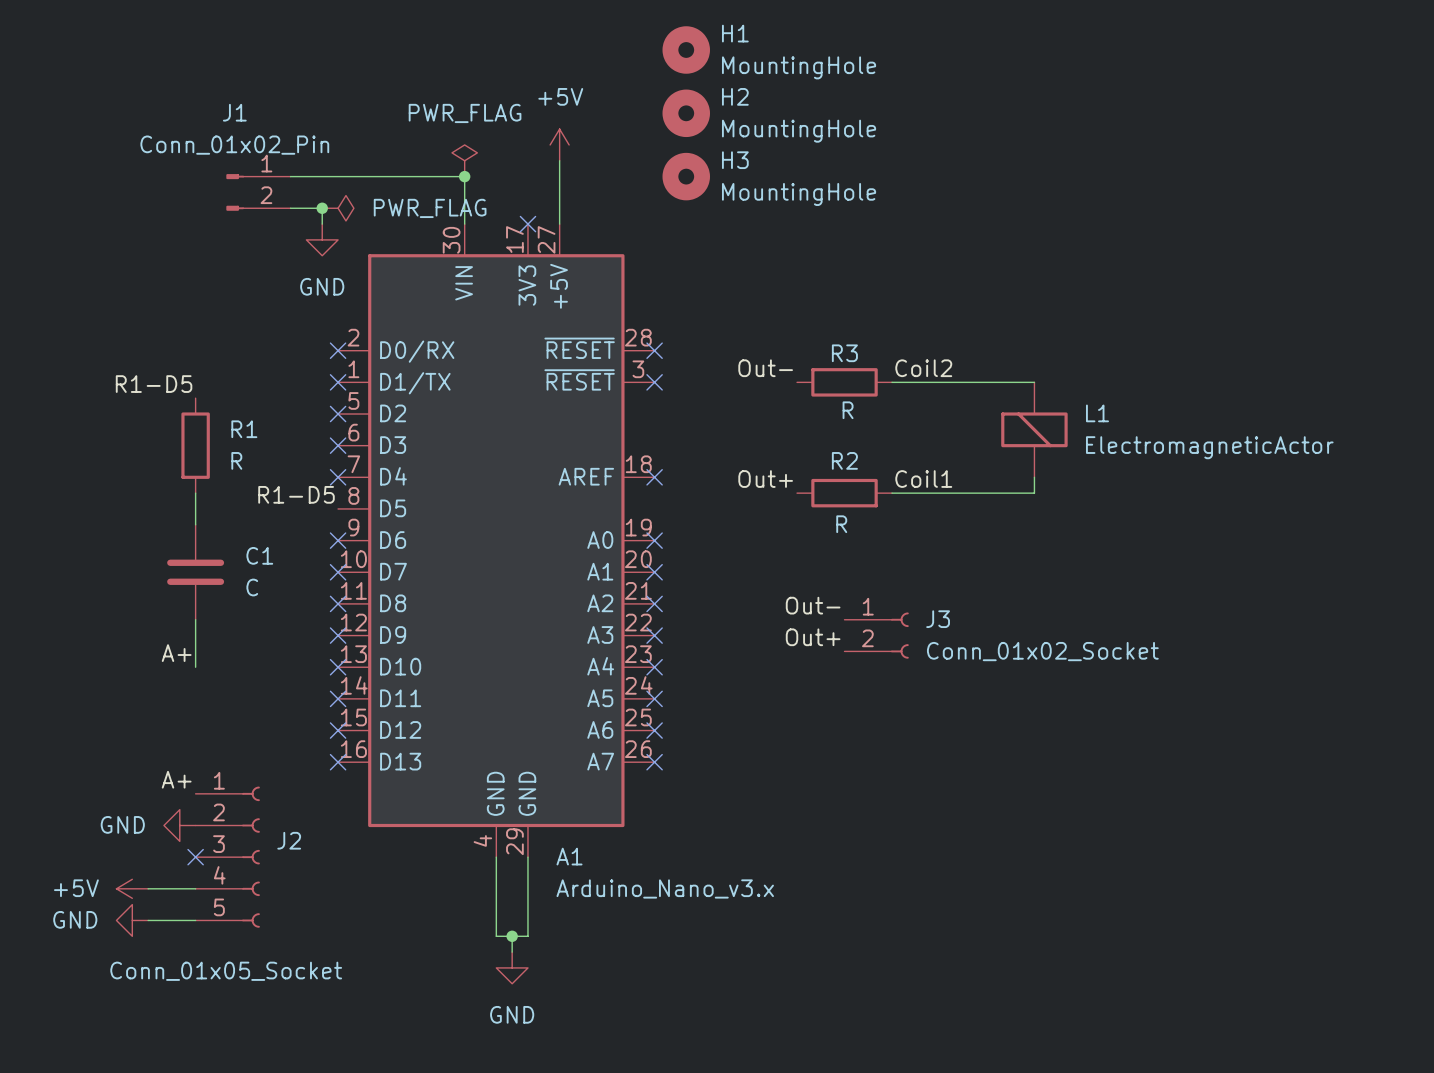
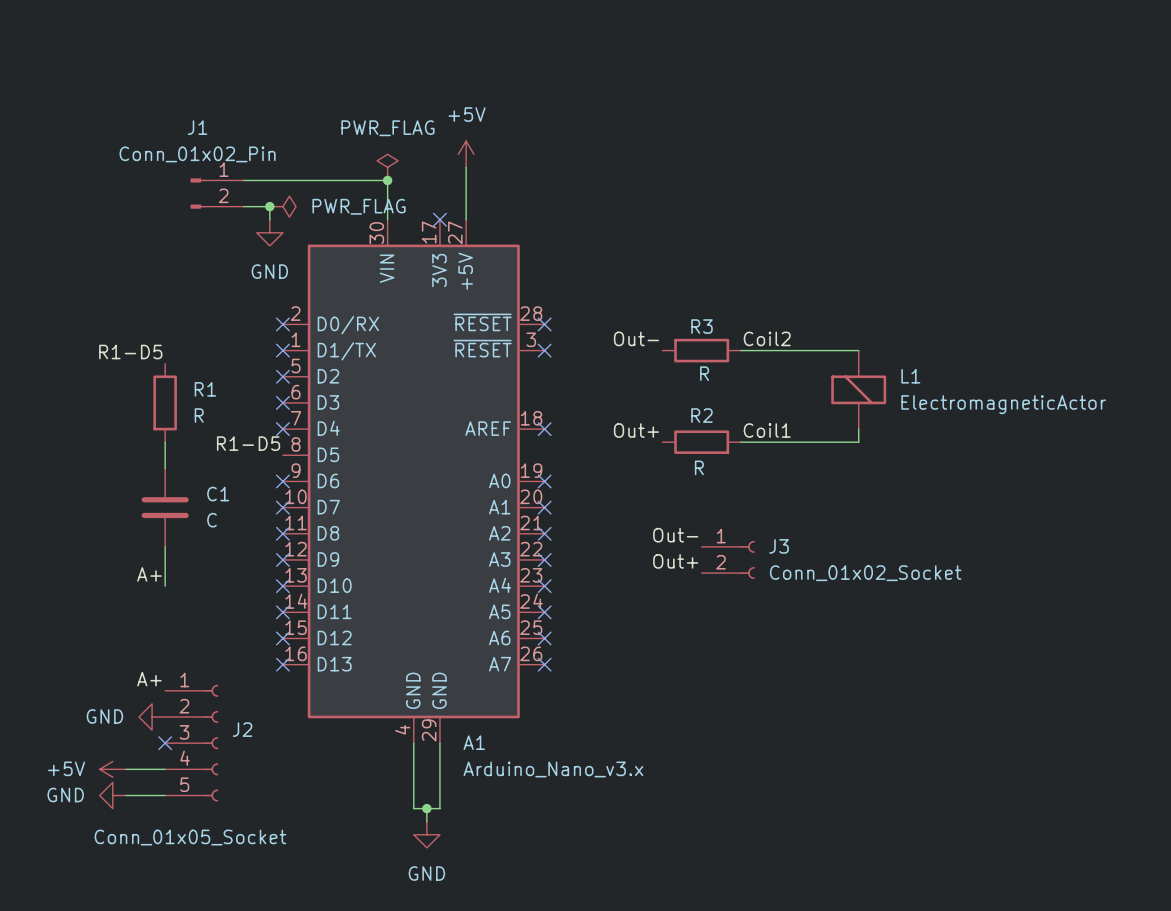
H1: MountingHole (686, 49) -> none
H2: MountingHole (686, 113) -> none
H3: MountingHole (686, 176) -> none

